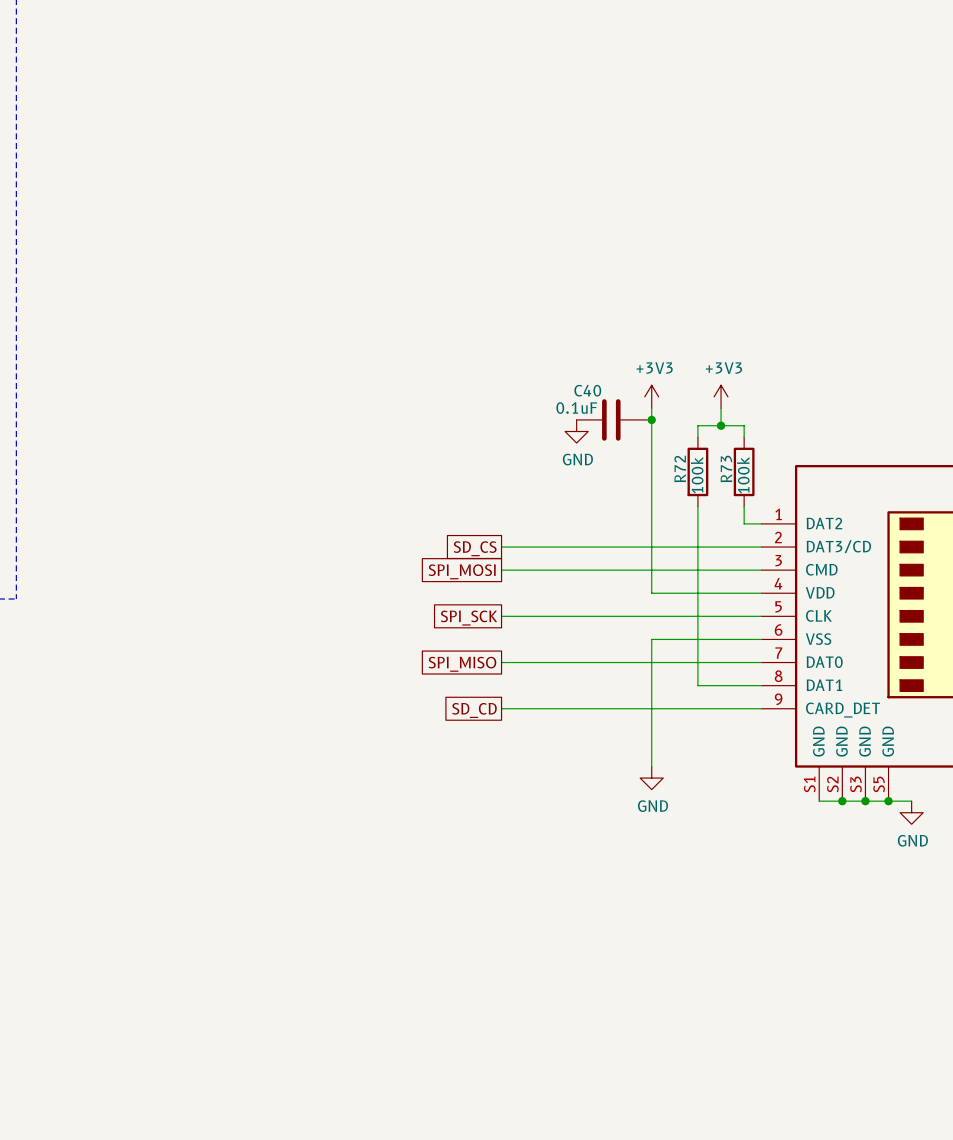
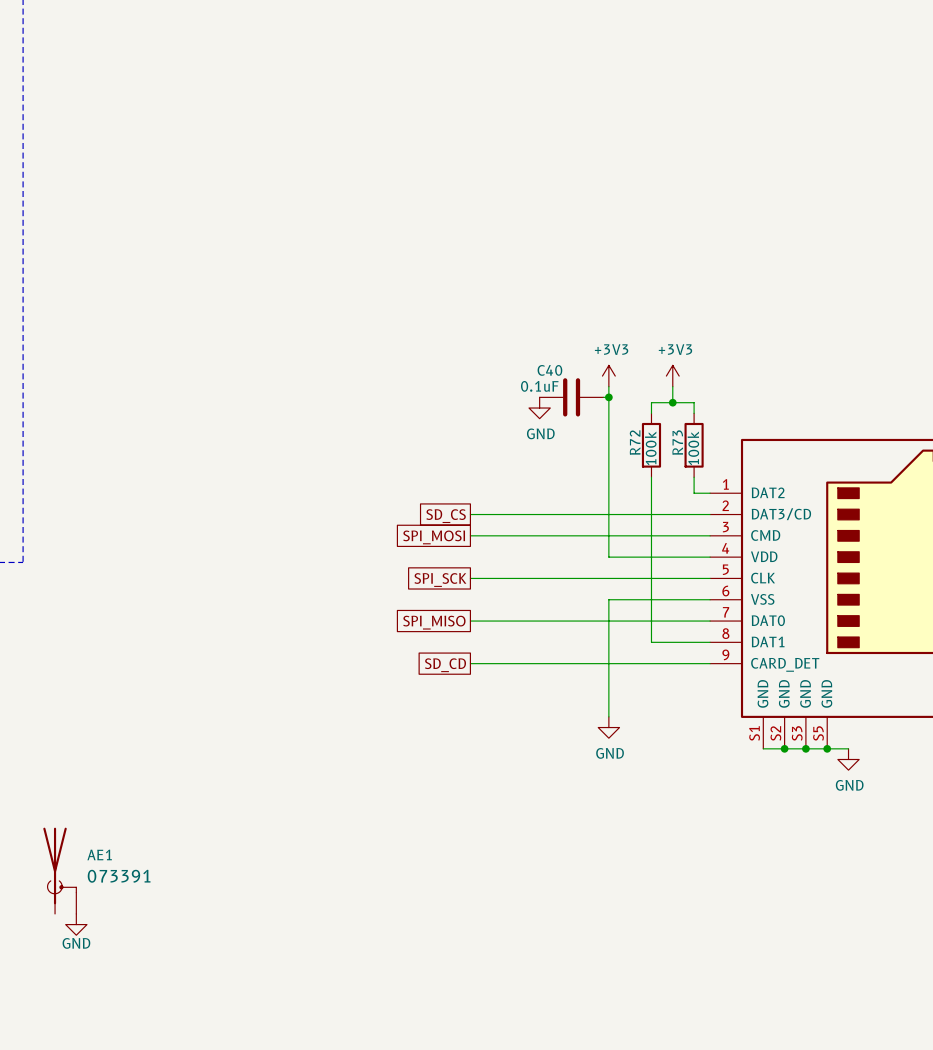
AE1: none -> (59, 870)
power symbol: none -> GND (76, 924)

